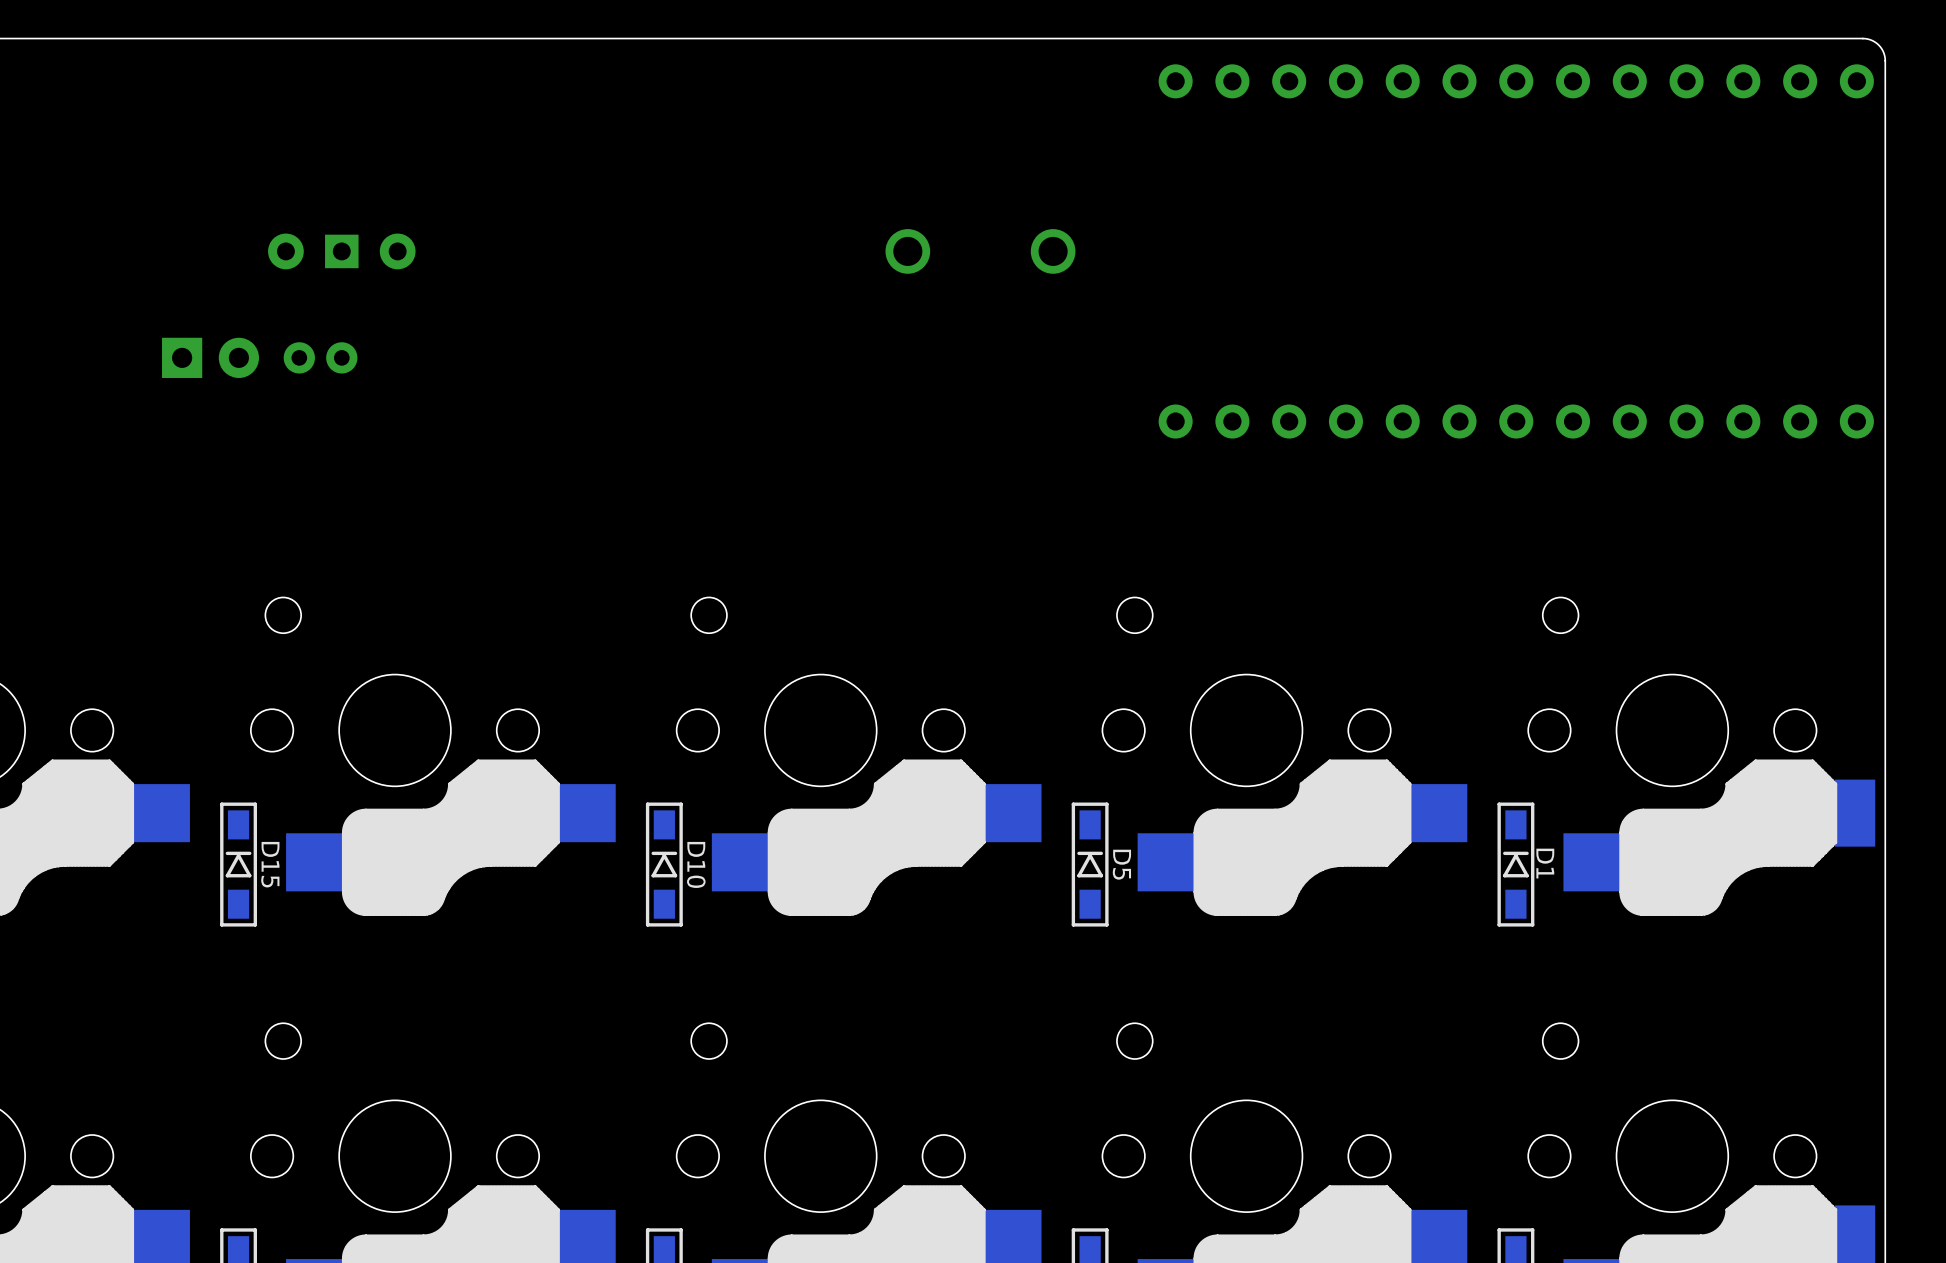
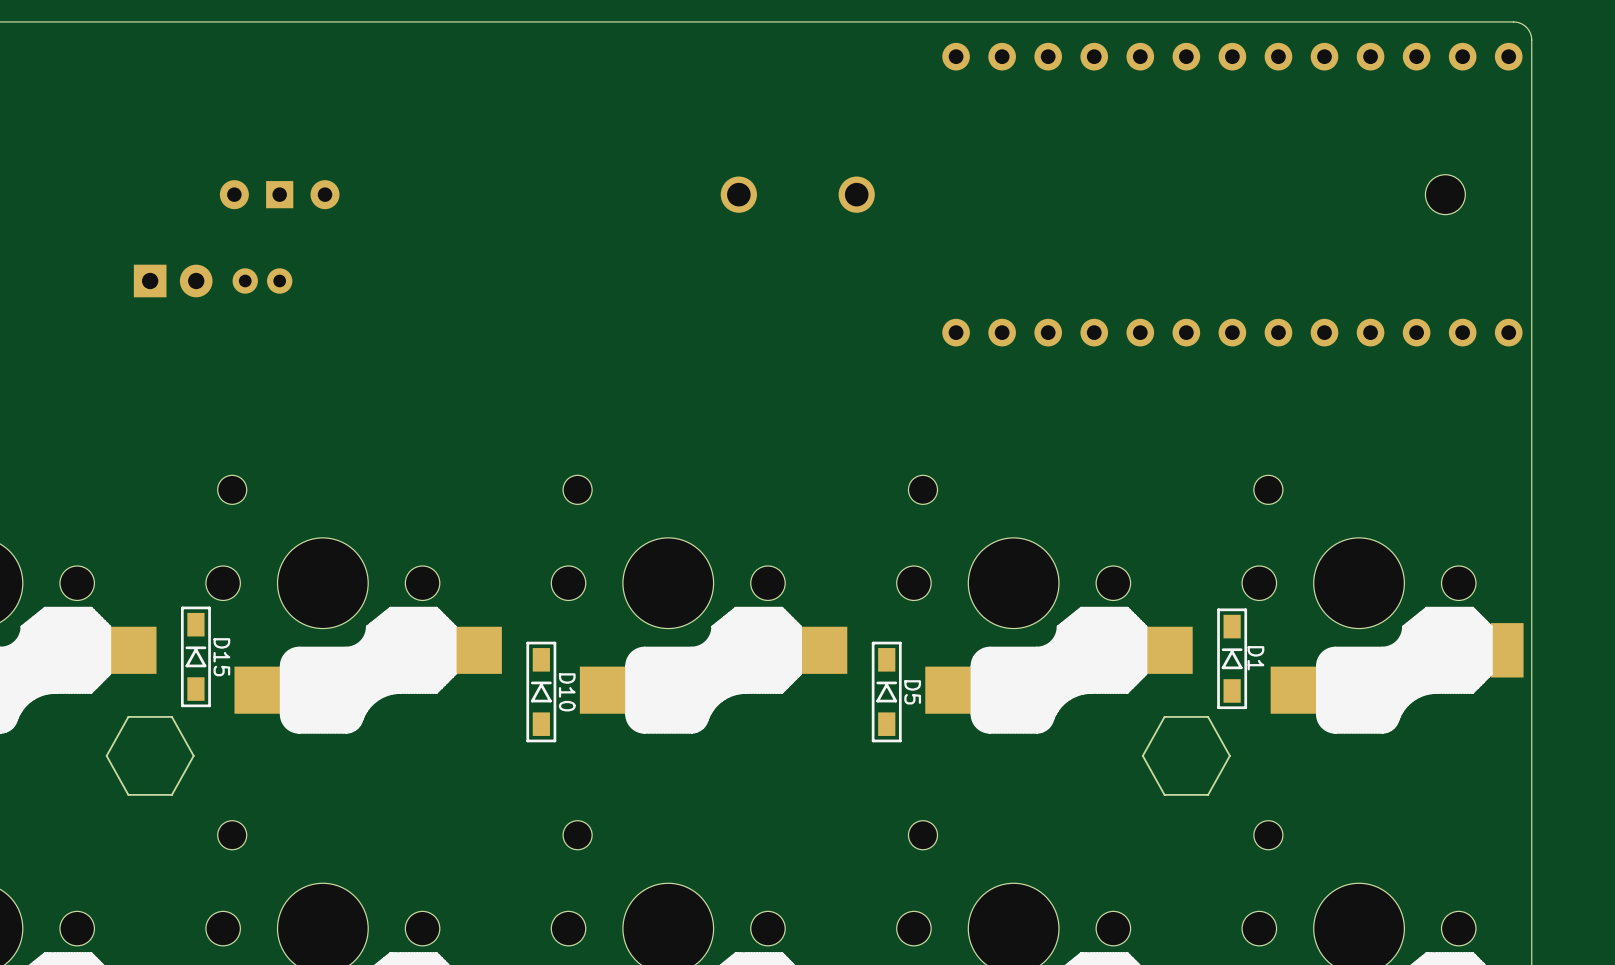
part: none -> (1445, 194)
D15 position: (238, 864) -> (195, 656)
D1 position: (1515, 864) -> (1232, 658)
drawing: none -> [105, 716, 195, 796]
drawing: none -> [1141, 716, 1231, 796]

